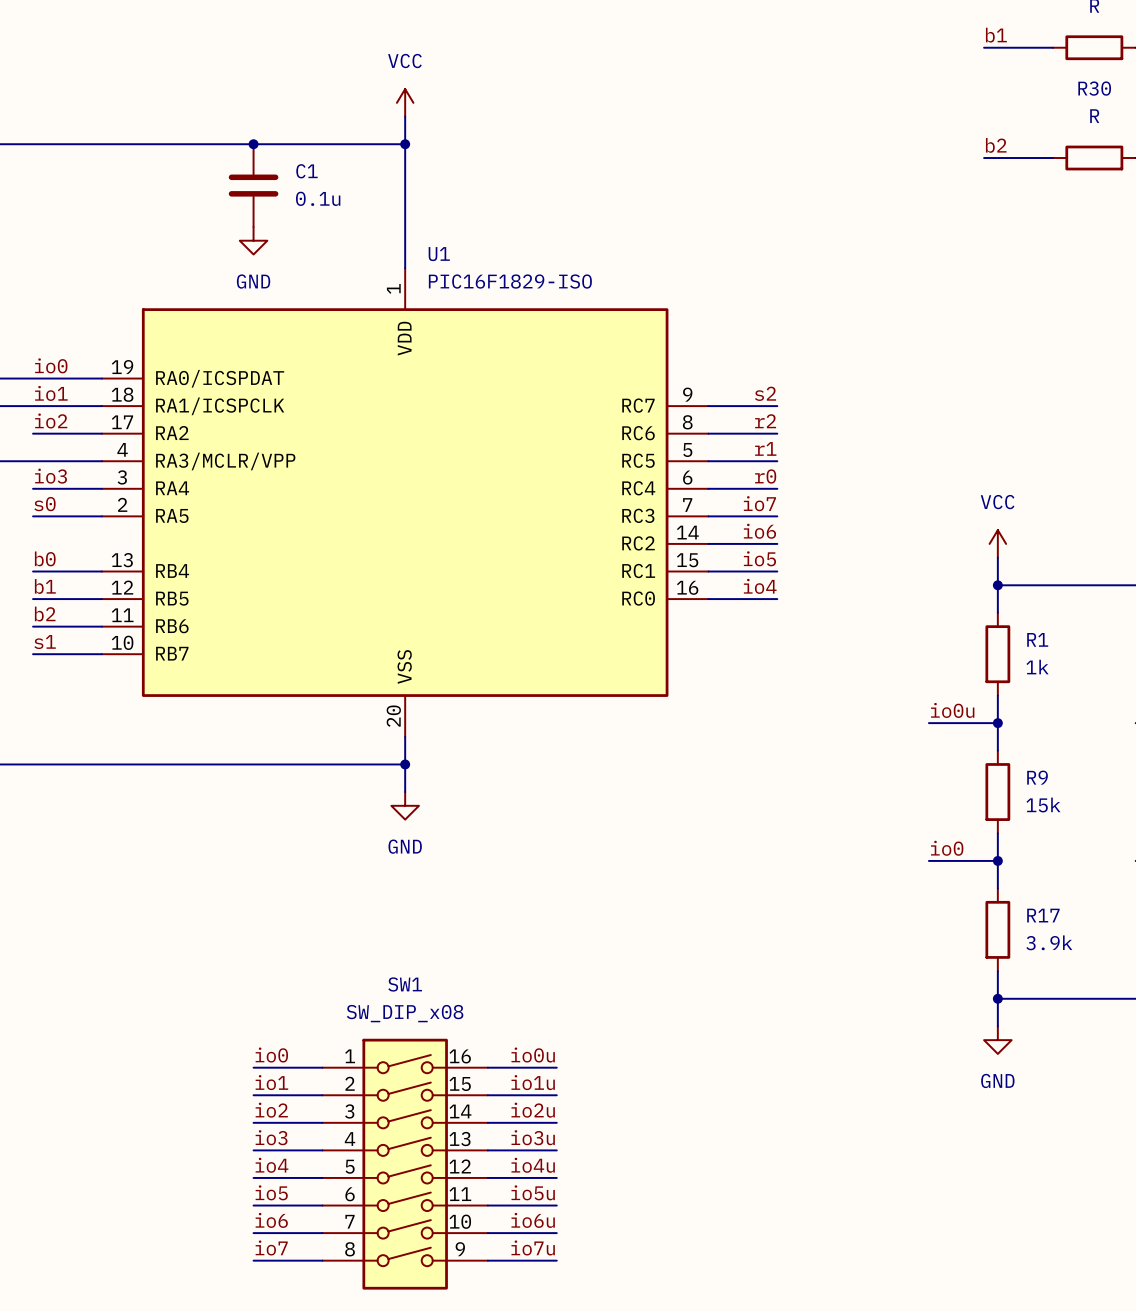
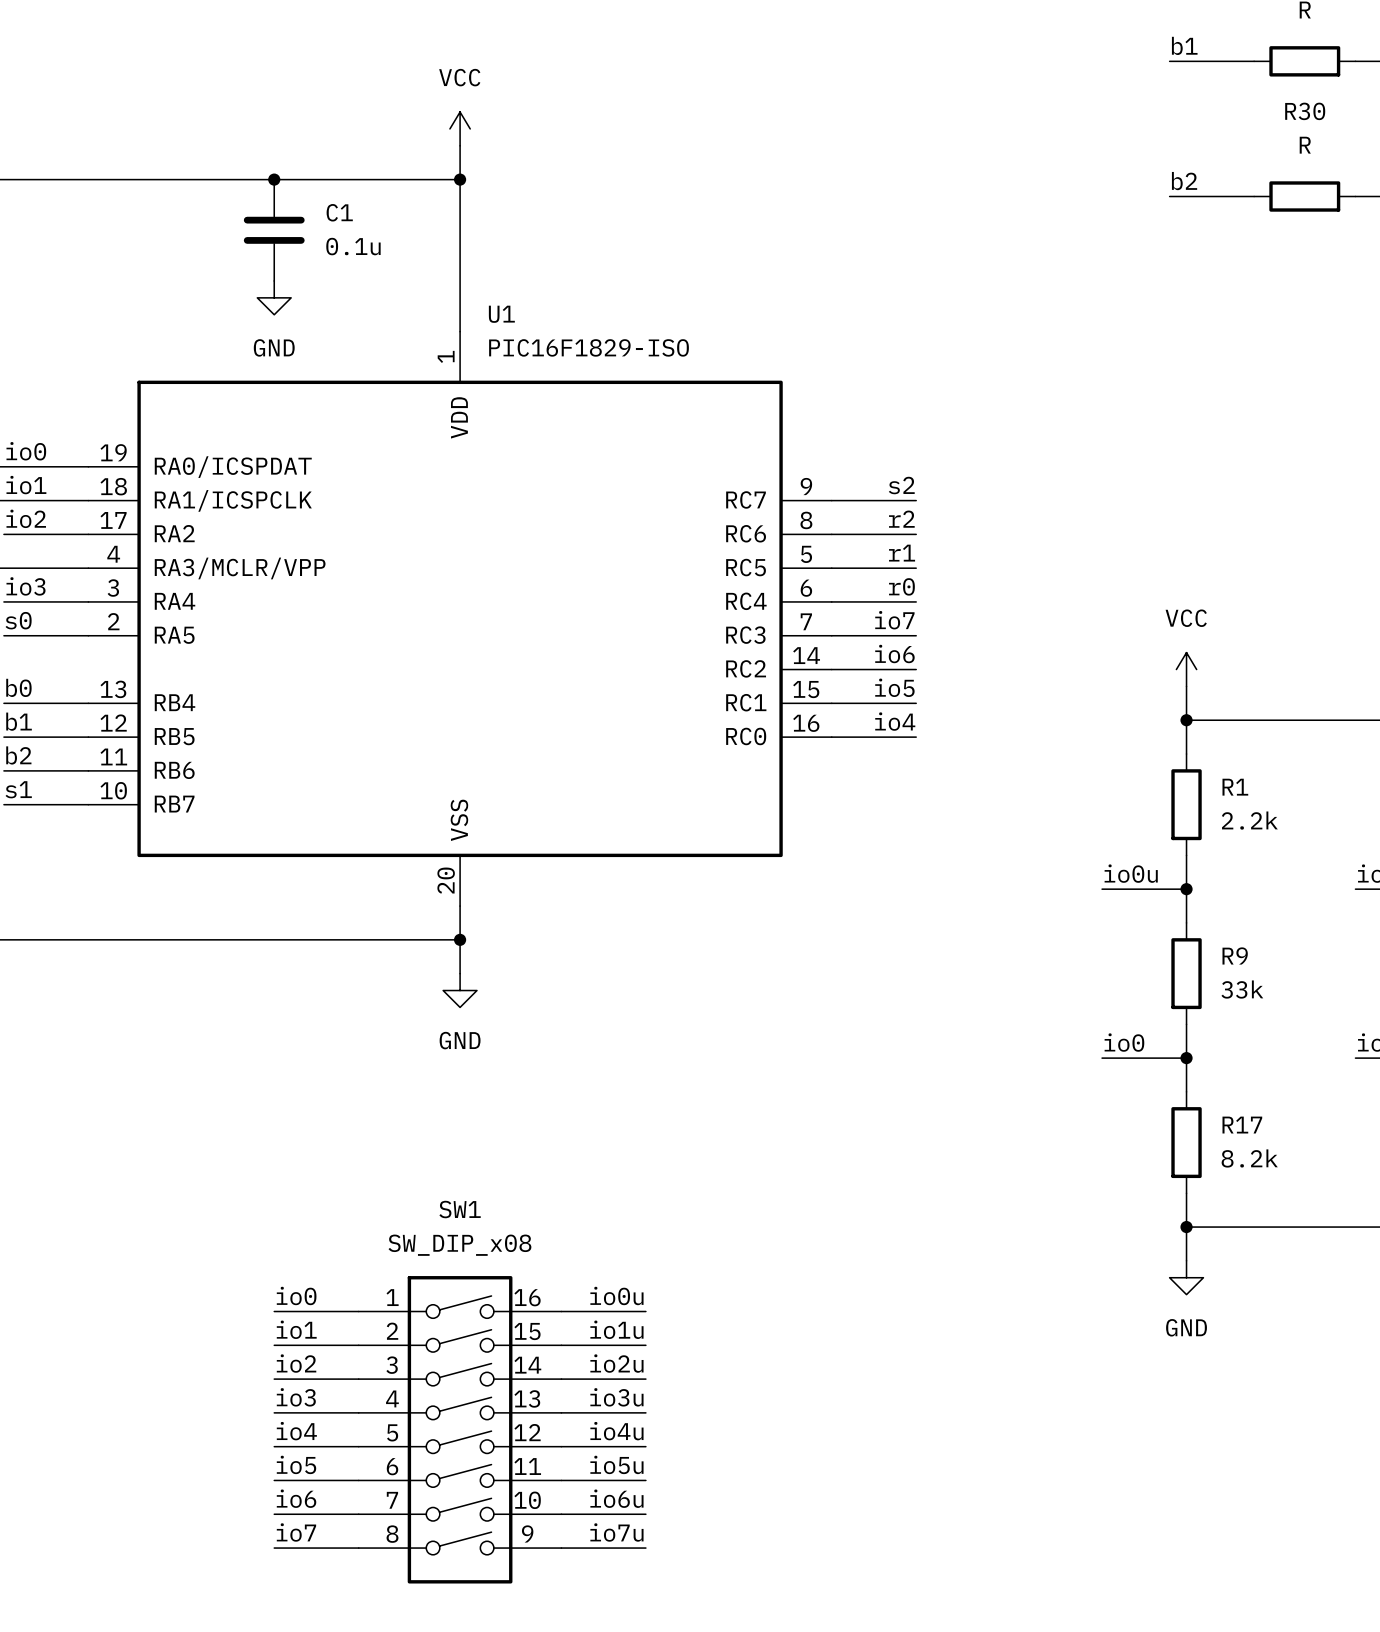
R1 value: 1k (1037, 667) -> 2.2k (1249, 820)
R9 value: 15k (1043, 805) -> 33k (1242, 989)
R17 value: 3.9k (1049, 942) -> 8.2k (1249, 1158)

